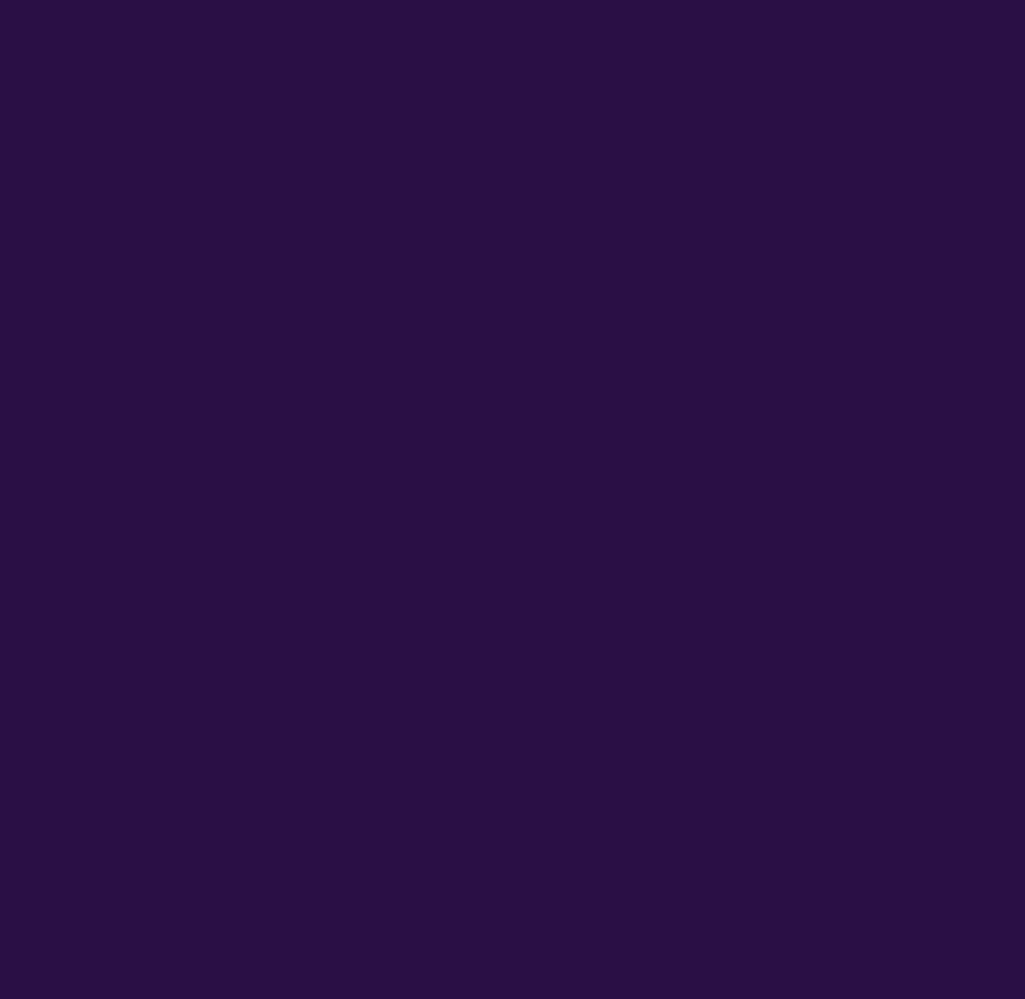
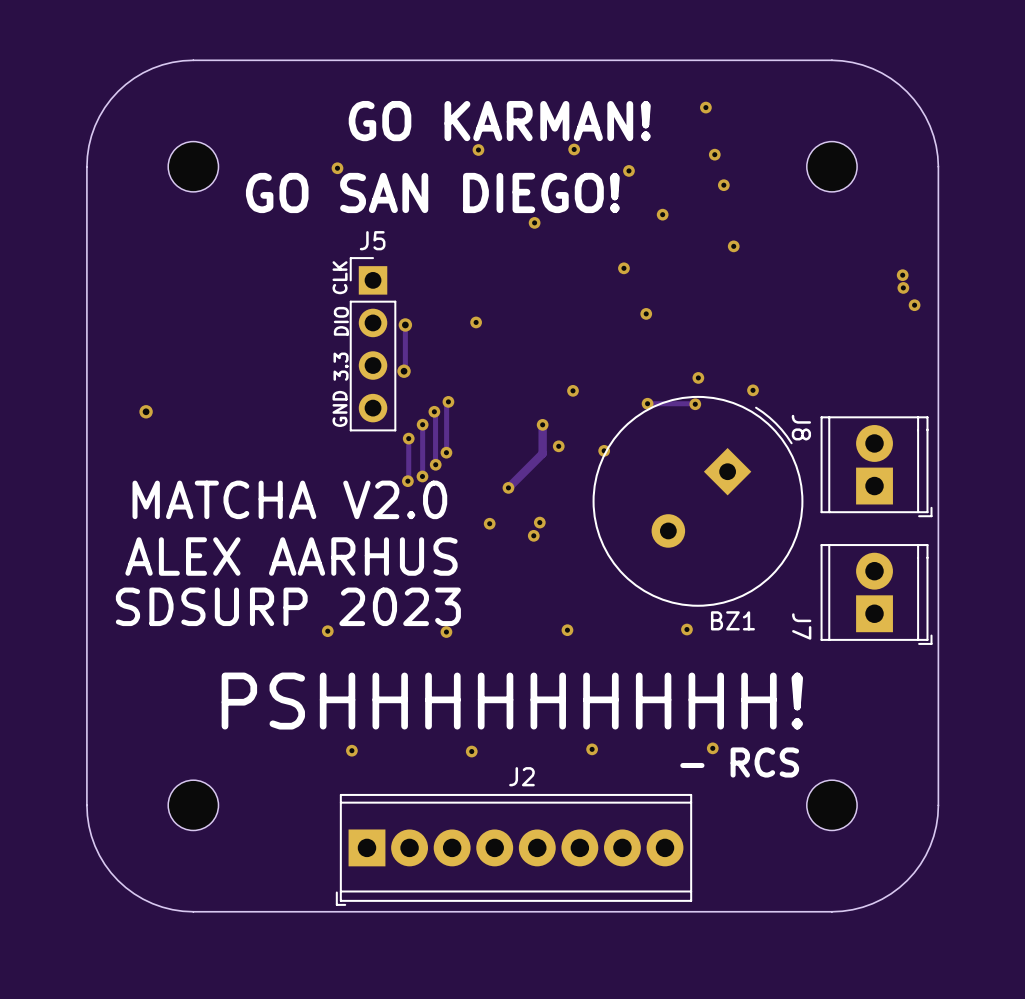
board edge: none -> (831, 60) (182, 60) (162, 64) (143, 72) (125, 84) (111, 99) (95, 126) (88, 145) (86, 166) (86, 805) (91, 836) (99, 855) (111, 872) (125, 887) (152, 903) (172, 909) (193, 911) (831, 911) (852, 909) (882, 899) (899, 887) (914, 872) (925, 855) (933, 836) (938, 805) (937, 156) (930, 126) (920, 107) (906, 91) (890, 78) (872, 68) (852, 62) (831, 60)
via: none -> (705, 107)
text: none -> GO KARMAN! (499, 121)
via: none -> (478, 149)
via: none -> (574, 149)
via: none -> (714, 154)
part: none -> (193, 166)
part: none -> (831, 166)
via: none -> (337, 168)
via: none -> (628, 170)
via: none -> (723, 185)
text: none -> GO SAN DIEGO! (432, 192)
via: none -> (662, 214)
via: none -> (534, 222)
via: none -> (733, 246)
via: none -> (623, 268)
via: none -> (902, 275)
text: none -> CLK (340, 277)
via: none -> (903, 287)
via: none -> (914, 305)
via: none -> (646, 313)
text: none -> DIO (341, 321)
via: none -> (476, 322)
track: none -> (405, 324) (404, 371)
via: none -> (405, 324)
J5: none -> (373, 344)
text: none -> 3.3 (341, 366)
via: none -> (404, 371)
via: none -> (698, 377)
via: none -> (572, 390)
via: none -> (753, 390)
track: none -> (448, 401) (446, 403) (446, 452)
via: none -> (448, 401)
track: none -> (647, 403) (695, 404)
via: none -> (647, 403)
via: none -> (695, 404)
text: none -> GND (340, 408)
via: none -> (146, 411)
track: none -> (434, 411) (435, 464)
via: none -> (434, 411)
track: none -> (422, 424) (422, 476)
via: none -> (422, 424)
track: none -> (542, 424) (542, 453) (508, 487)
via: none -> (542, 424)
track: none -> (408, 438) (407, 481)
via: none -> (408, 438)
via: none -> (558, 446)
via: none -> (604, 450)
via: none -> (446, 452)
via: none -> (435, 464)
J8: none -> (876, 466)
via: none -> (422, 476)
via: none -> (407, 481)
via: none -> (508, 487)
text: none -> MATCHA V2.0 (289, 499)
BZ1: none -> (697, 501)
via: none -> (539, 522)
via: none -> (489, 523)
via: none -> (533, 535)
text: none -> ALEX AARHUS (291, 556)
J7: none -> (876, 594)
text: none -> SDSURP 2023 (288, 606)
via: none -> (686, 629)
via: none -> (567, 630)
via: none -> (327, 631)
via: none -> (446, 632)
text: none -> PSHHHHHHHHH! (512, 701)
via: none -> (712, 748)
via: none -> (592, 749)
via: none -> (351, 750)
via: none -> (471, 751)
text: none -> - RCS (739, 762)
part: none -> (193, 805)
part: none -> (831, 805)
J2: none -> (514, 849)

